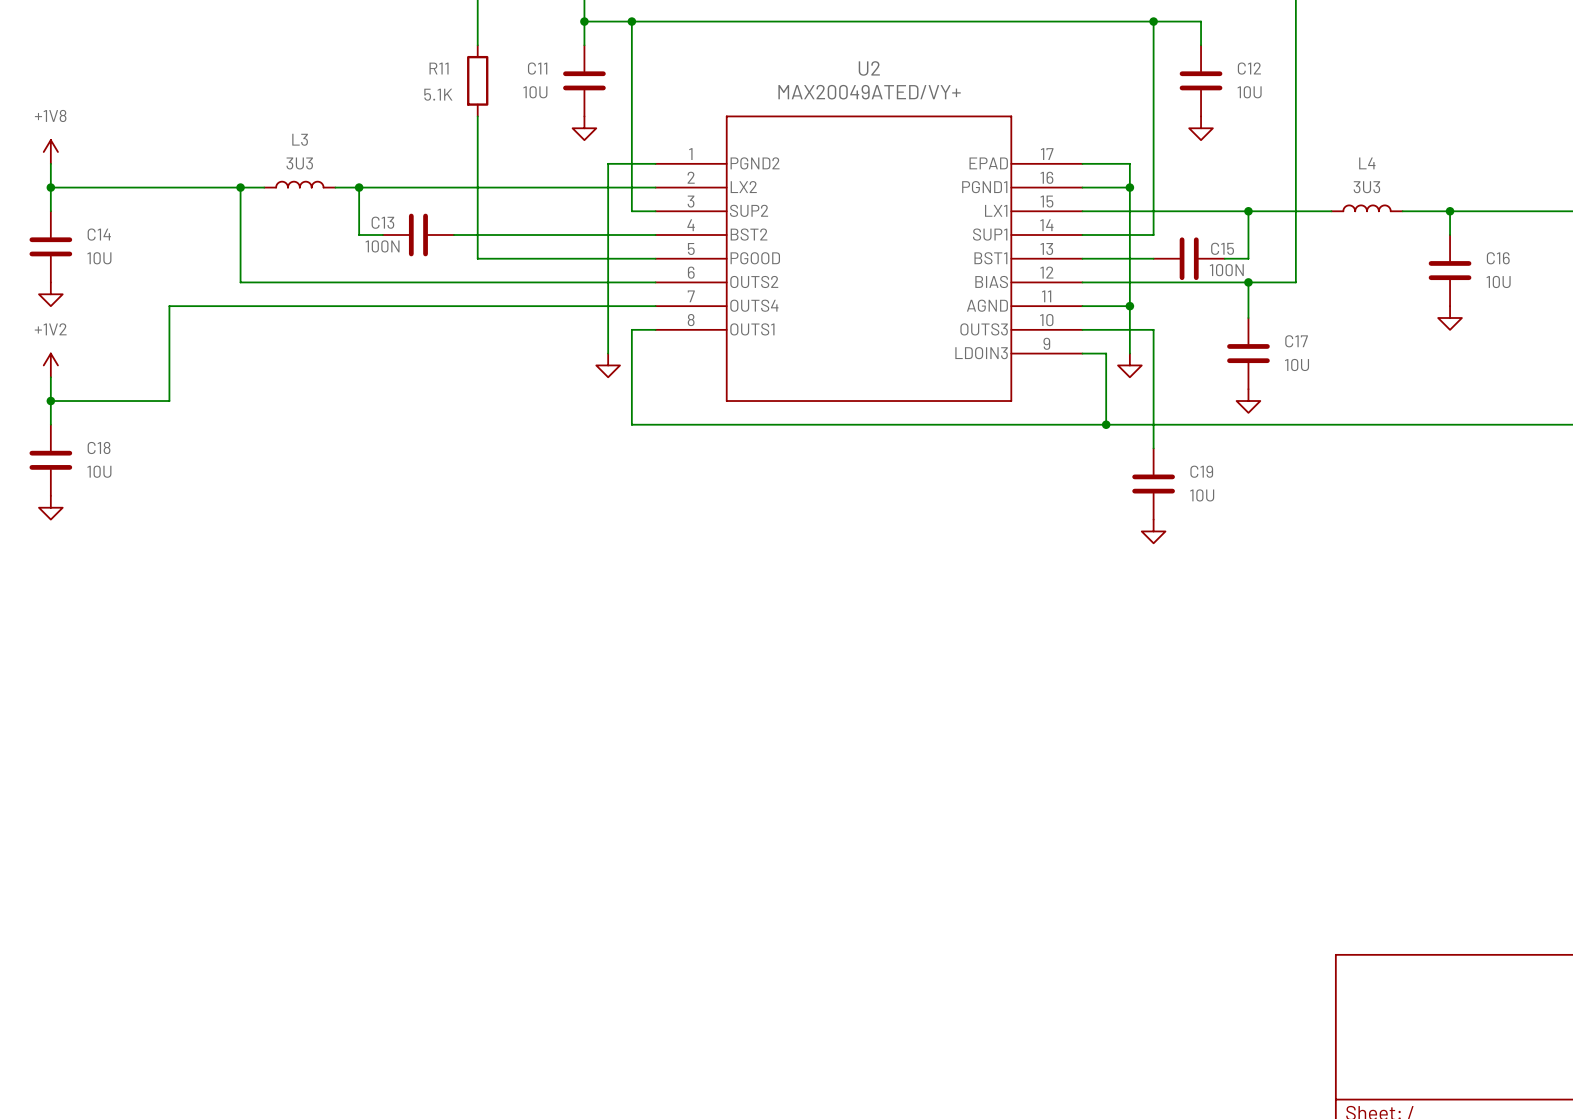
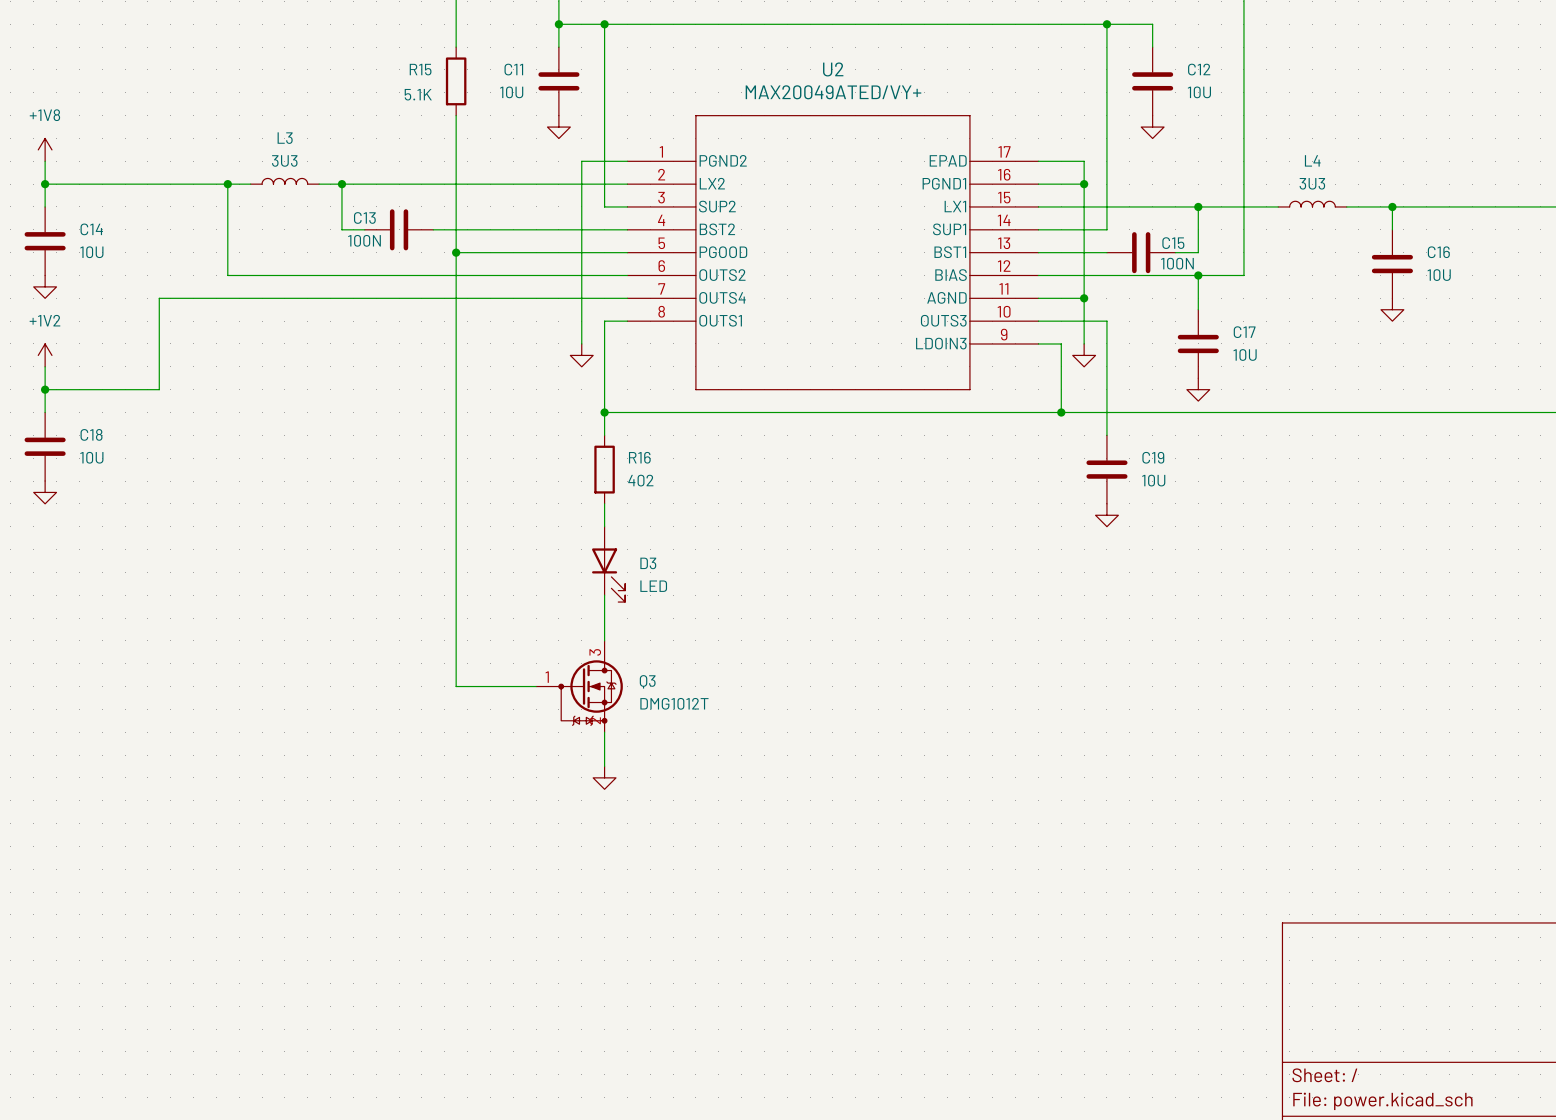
R11 name: R11 (439, 68) -> R15 (420, 69)
wire: none -> (456, 252) (456, 686) (536, 686)
junction: none -> (456, 252)
wire: none -> (604, 412) (604, 435)
junction: none -> (604, 412)
R16: none -> 402 (604, 469)
wire: none -> (604, 503) (604, 526)
D3: none -> LED (608, 564)
wire: none -> (604, 595) (604, 640)
Q3: none -> DMG1012T (579, 686)
wire: none -> (604, 732) (604, 766)
power symbol: none -> (604, 777)

